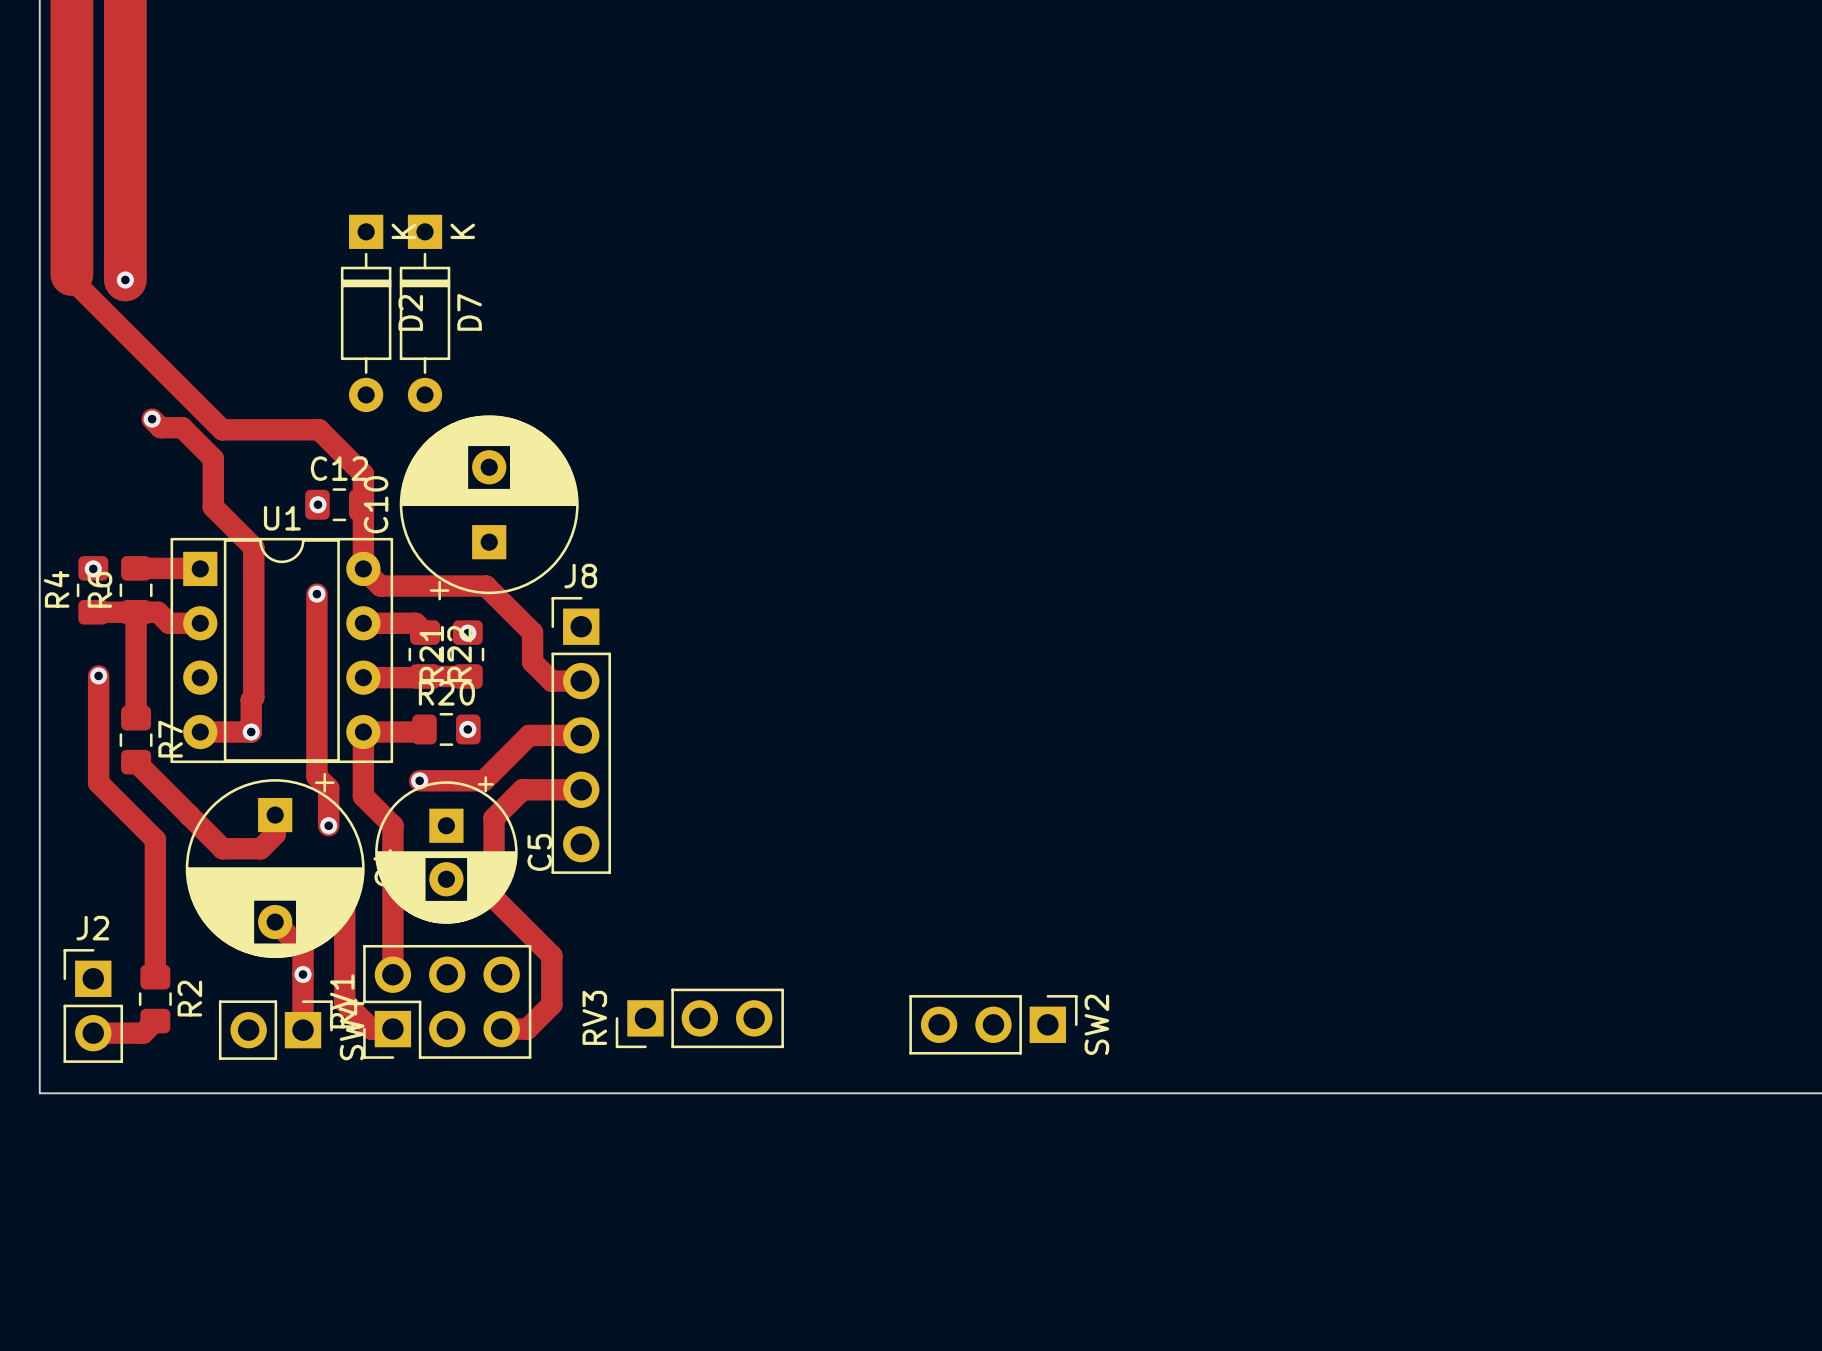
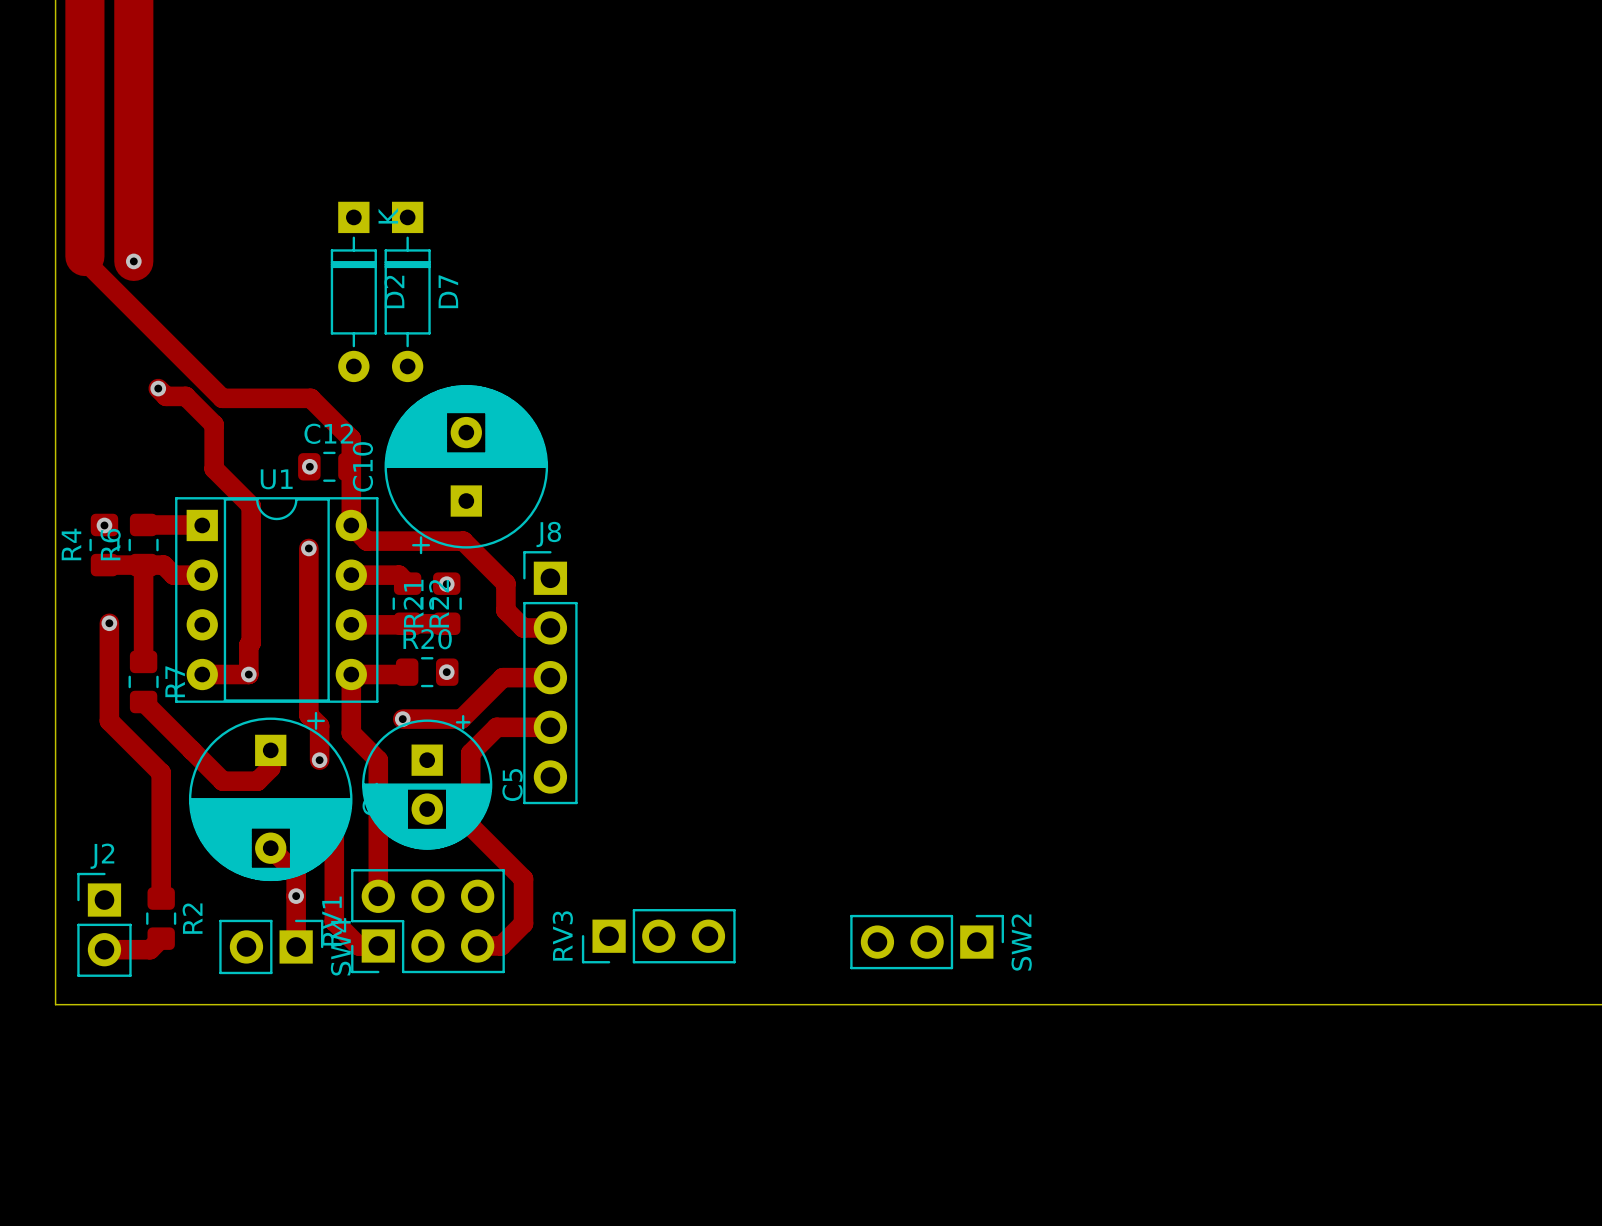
D7 text: K (462, 231) -> none

